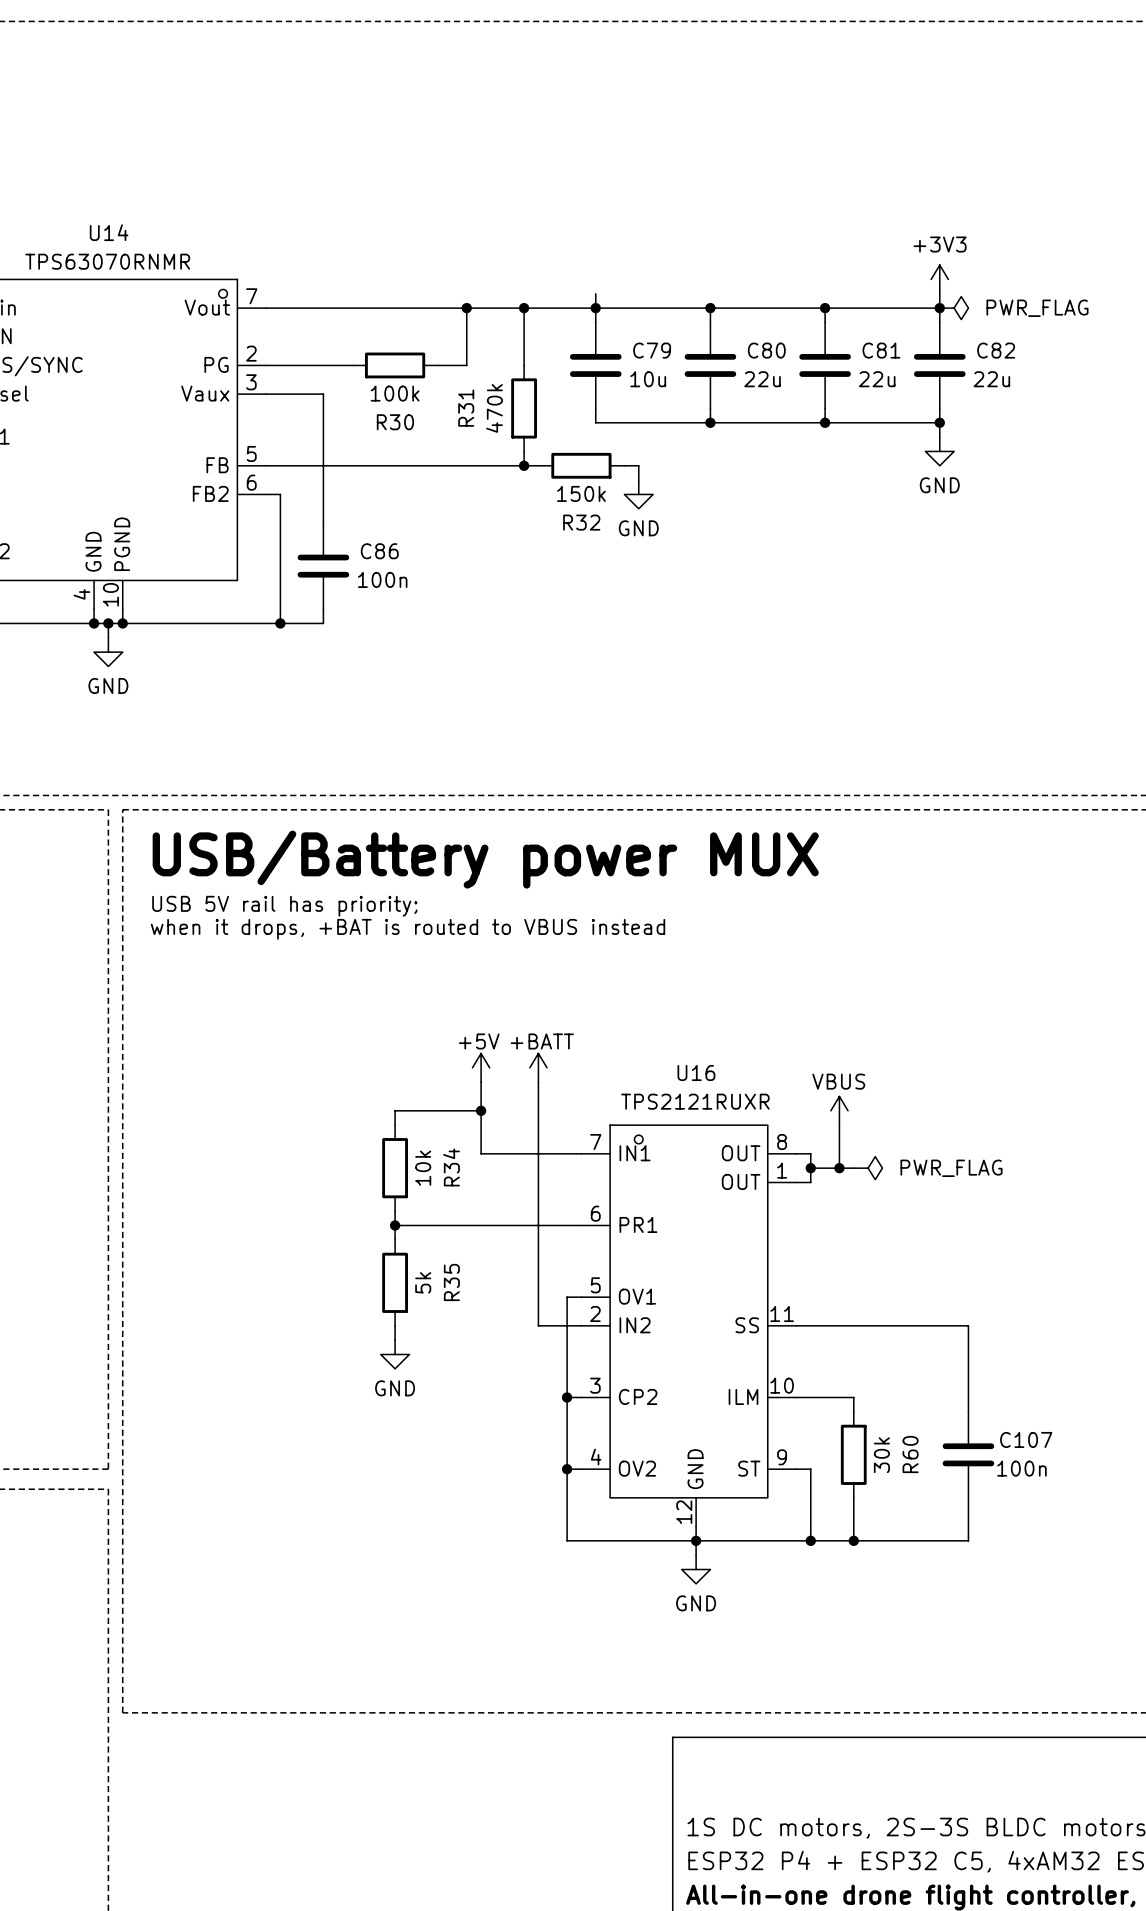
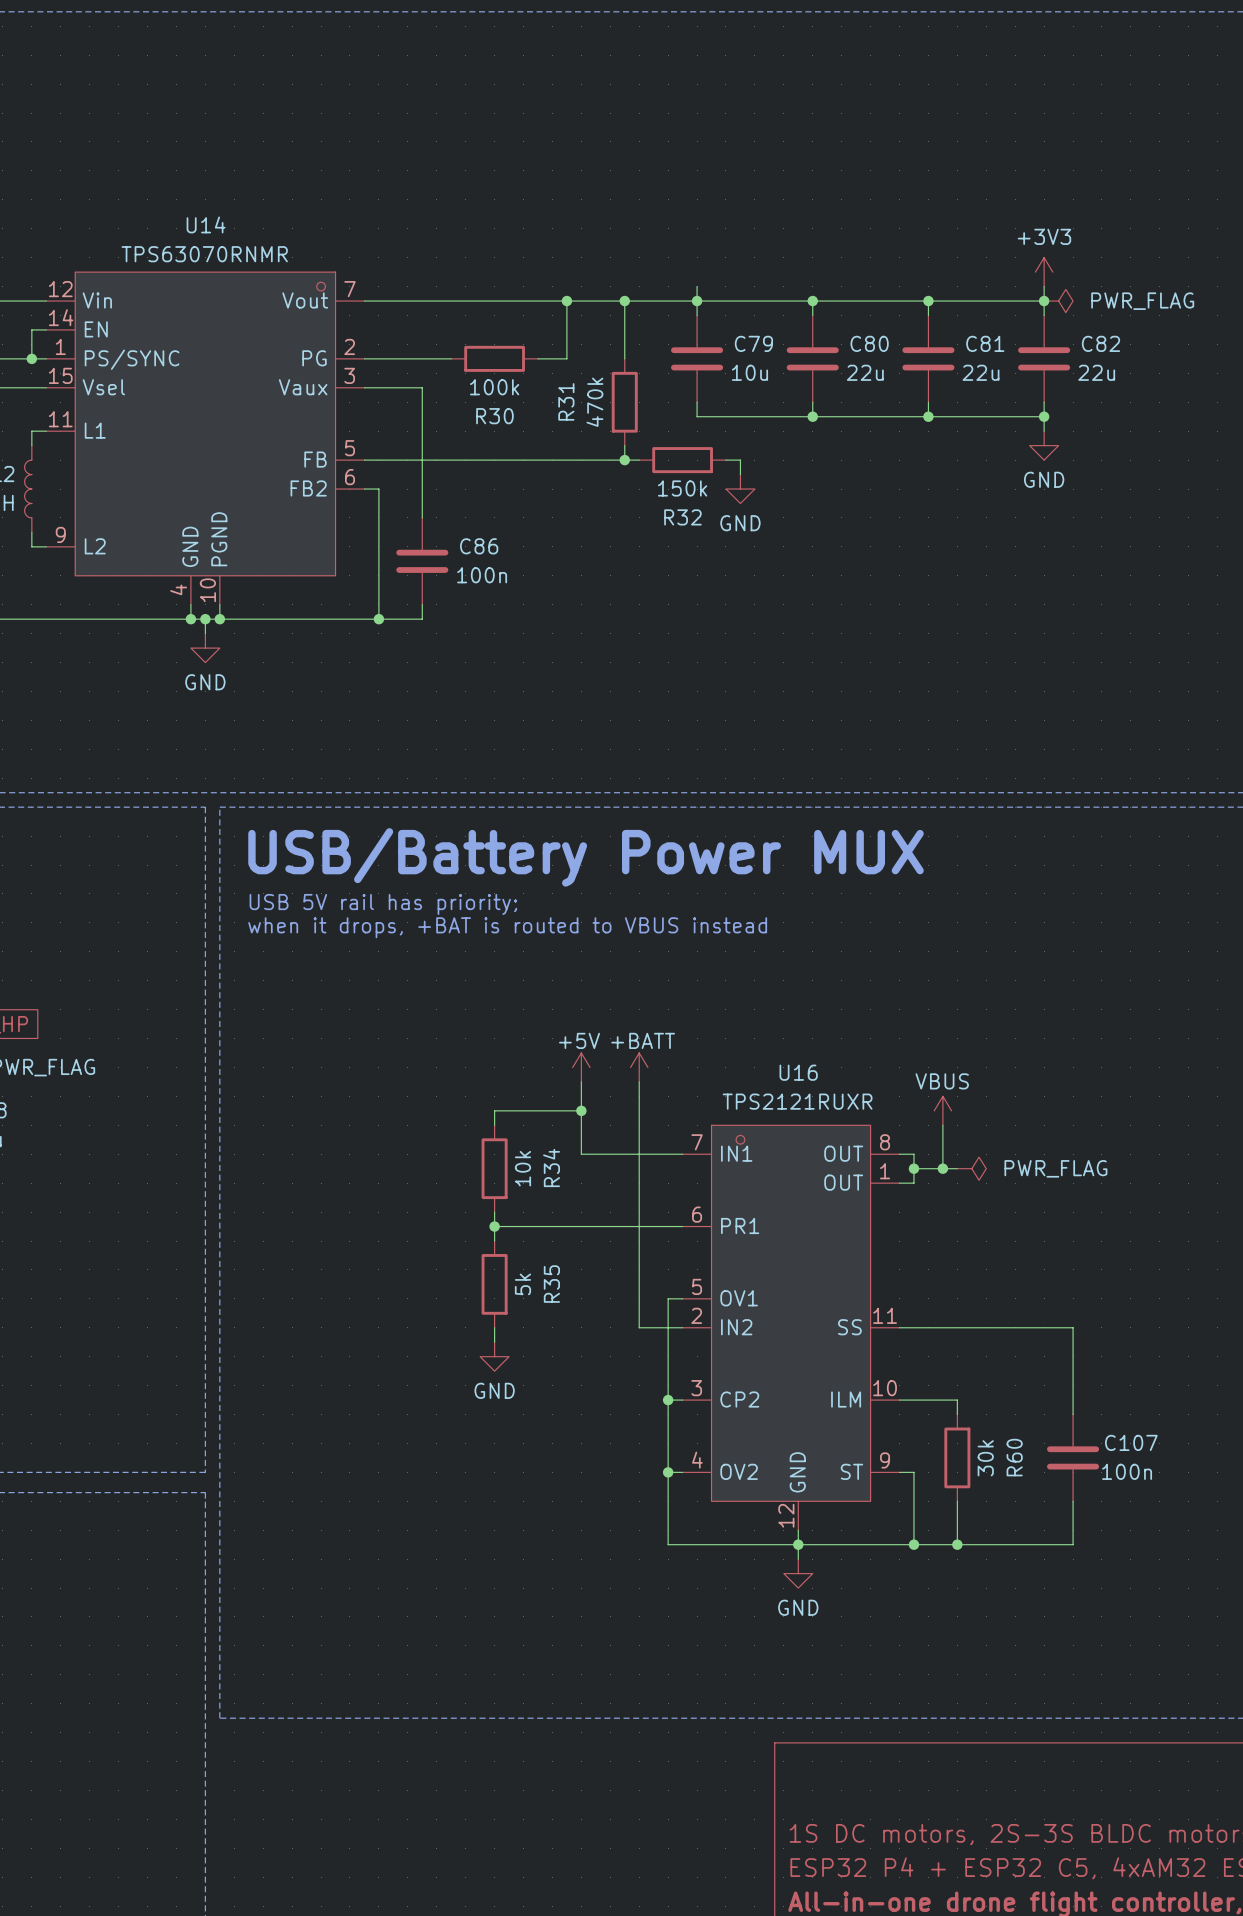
text: USB/Battery power MUX (485, 859) -> USB/Battery Power MUX (586, 857)

